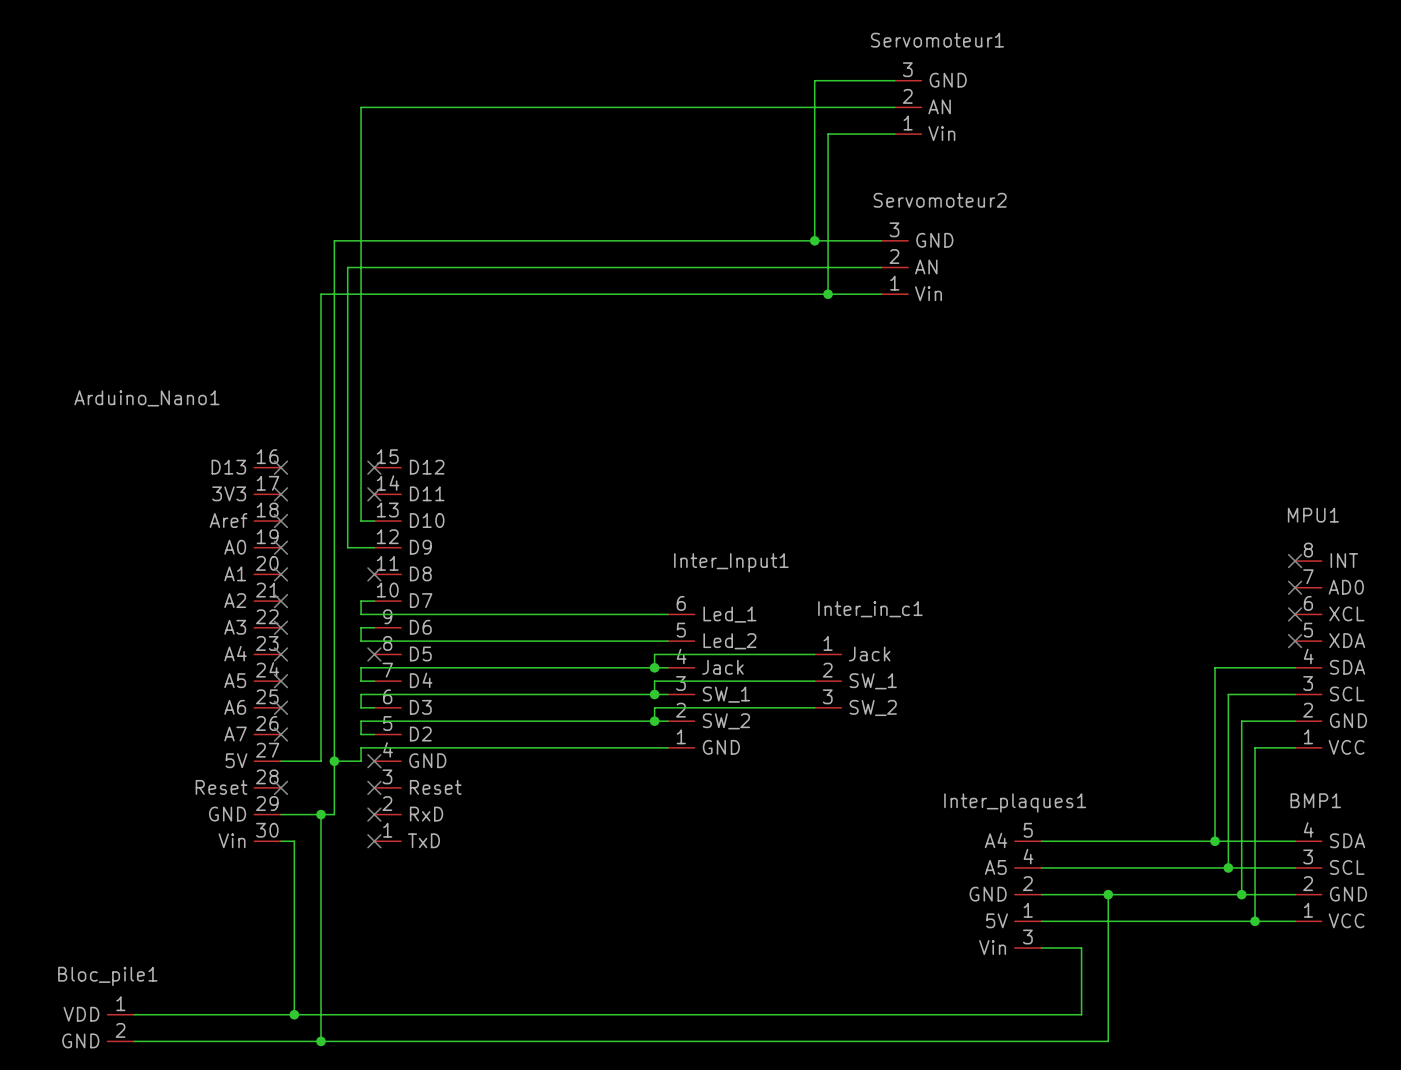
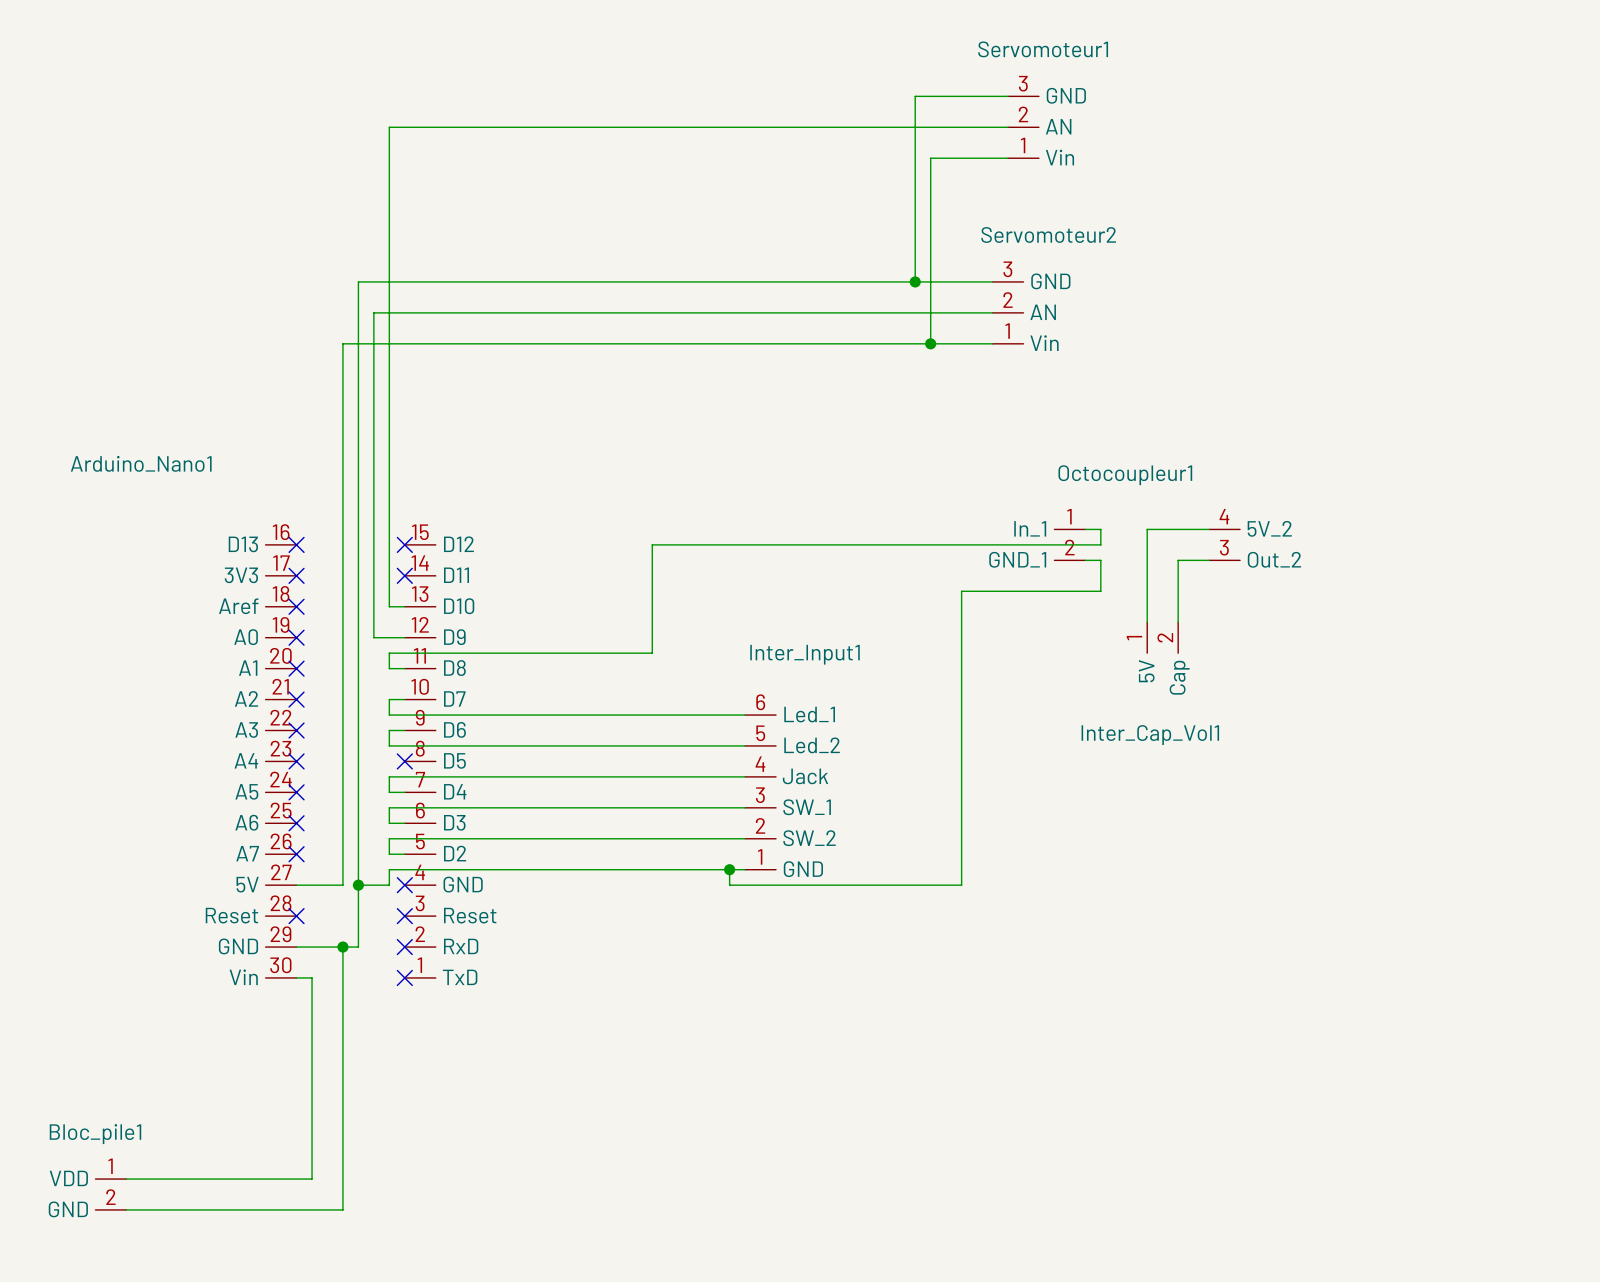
wire: none -> (1085, 529) (1100, 529) (1100, 544) (652, 544) (652, 653) (389, 653) (389, 668) (404, 668)
wire: none -> (1209, 529) (1147, 529) (1147, 622)
Octocoupleur1: none -> (1147, 544)
wire: none -> (1085, 560) (1100, 560) (1100, 591) (961, 591) (961, 885) (729, 885) (729, 869)
wire: none -> (1209, 560) (1178, 560) (1178, 622)
Inter_Cap_Vol1: none -> (1162, 637)
no-connect mark: (1295, 561) -> none
no-connect mark: (374, 574) -> none
no-connect mark: (1295, 587) -> none
no-connect mark: (1295, 614) -> none
no-connect mark: (1295, 641) -> none
wire: (814, 654) (654, 654) (654, 667) -> none
MPU1: (1308, 654) -> none
junction: (654, 667) -> none
wire: (1295, 667) (1215, 667) (1215, 841) -> none
wire: (814, 681) (654, 681) (654, 694) -> none
Inter_in_c1: (828, 681) -> none
junction: (654, 694) -> none
wire: (1295, 694) (1228, 694) (1228, 867) -> none
wire: (814, 707) (654, 707) (654, 721) -> none
junction: (654, 721) -> none
wire: (1295, 721) (1241, 721) (1241, 894) -> none
junction: none -> (729, 869)
wire: (1295, 747) (1255, 747) (1255, 921) -> none
wire: (1041, 841) (1295, 841) -> none
junction: (1215, 841) -> none
wire: (1041, 867) (1295, 867) -> none
junction: (1228, 867) -> none
BMP1: (1308, 881) -> none
Inter_plaques1: (1028, 894) -> none
wire: (1041, 894) (1295, 894) -> none
wire: (1108, 894) (1108, 1041) (321, 1041) -> none
junction: (1108, 894) -> none
junction: (1241, 894) -> none
wire: (1041, 921) (1295, 921) -> none
junction: (1255, 921) -> none
wire: (1041, 948) (1081, 948) (1081, 1014) (294, 1014) -> none
junction: (294, 1014) -> none
junction: (321, 1041) -> none

